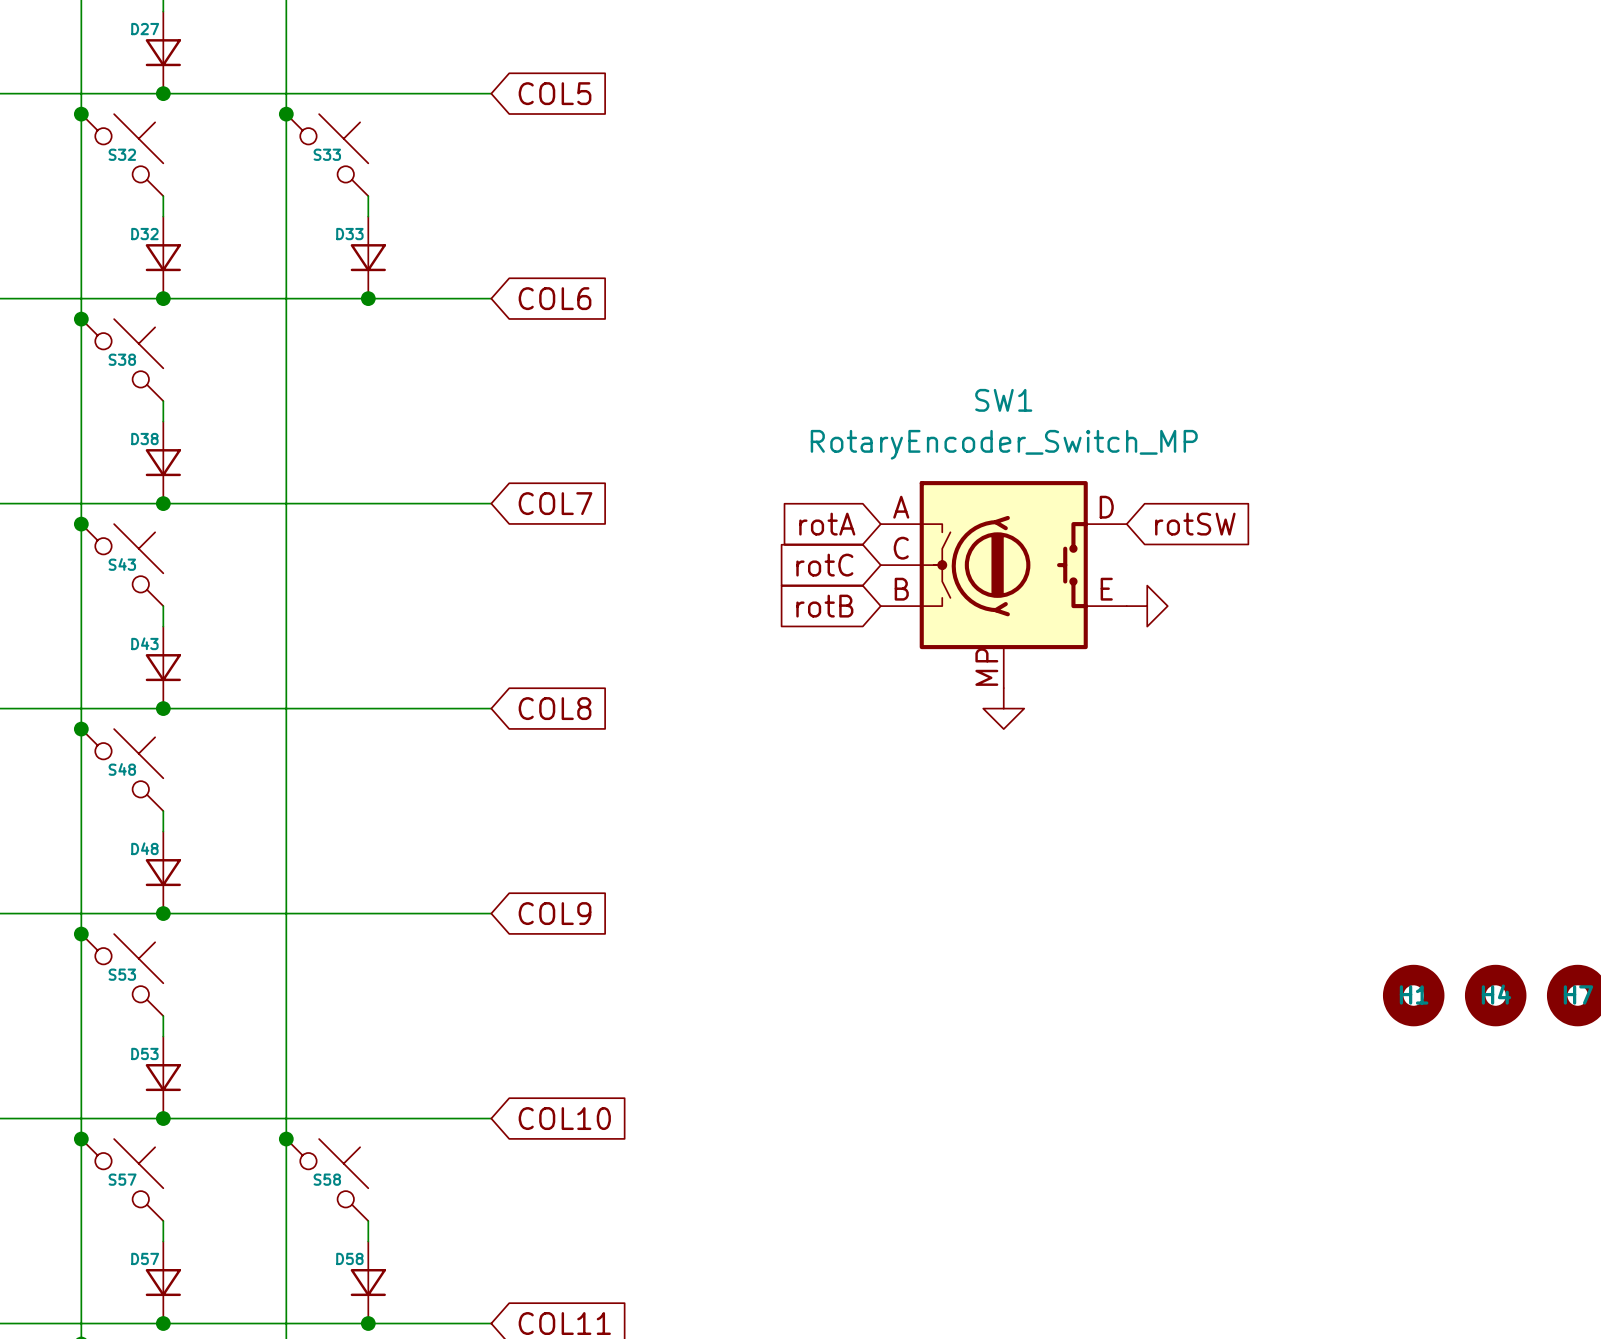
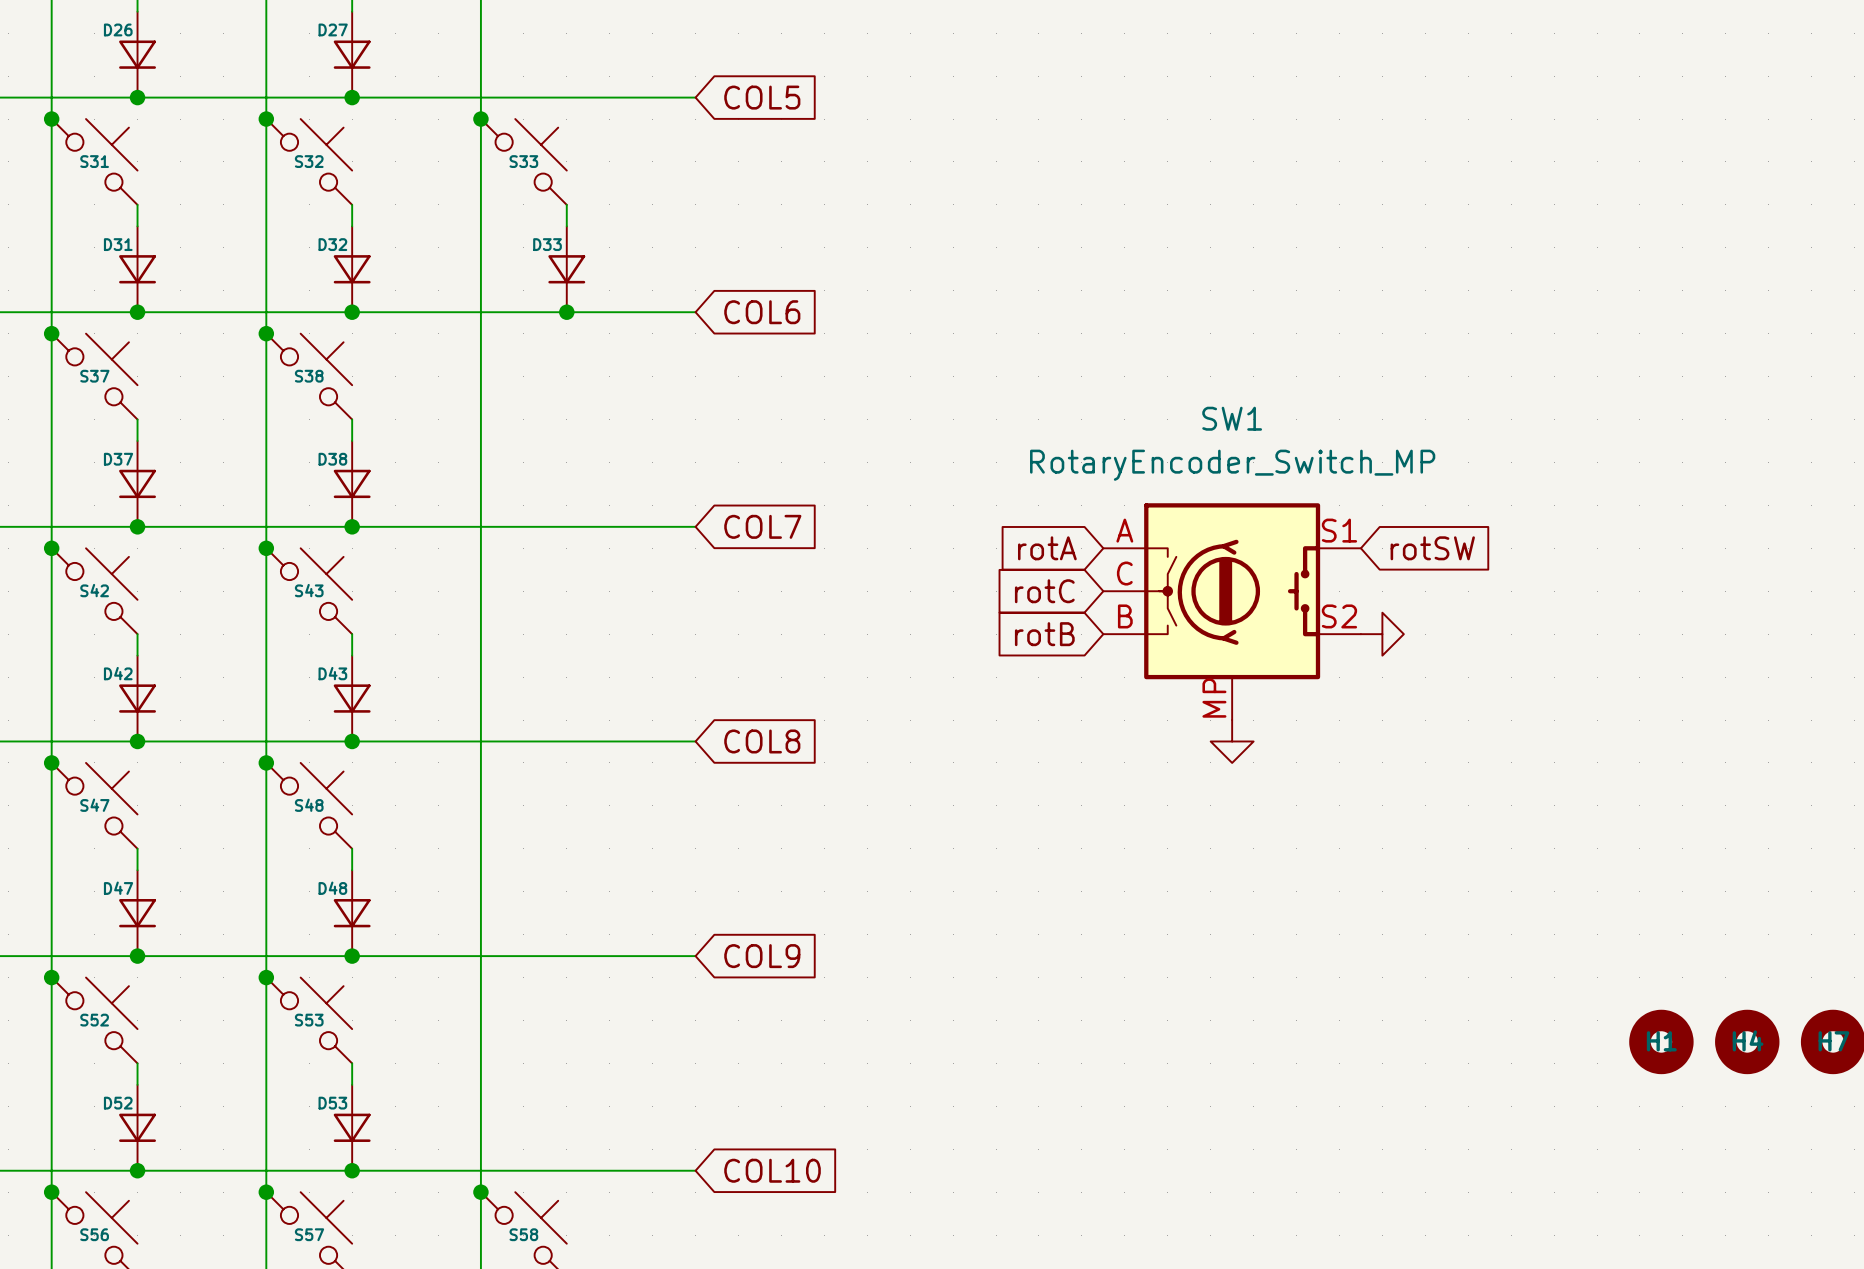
SW1 pin number: D (1106, 507) -> S1 (1339, 530)
SW1 pin number: E (1106, 589) -> S2 (1339, 616)

